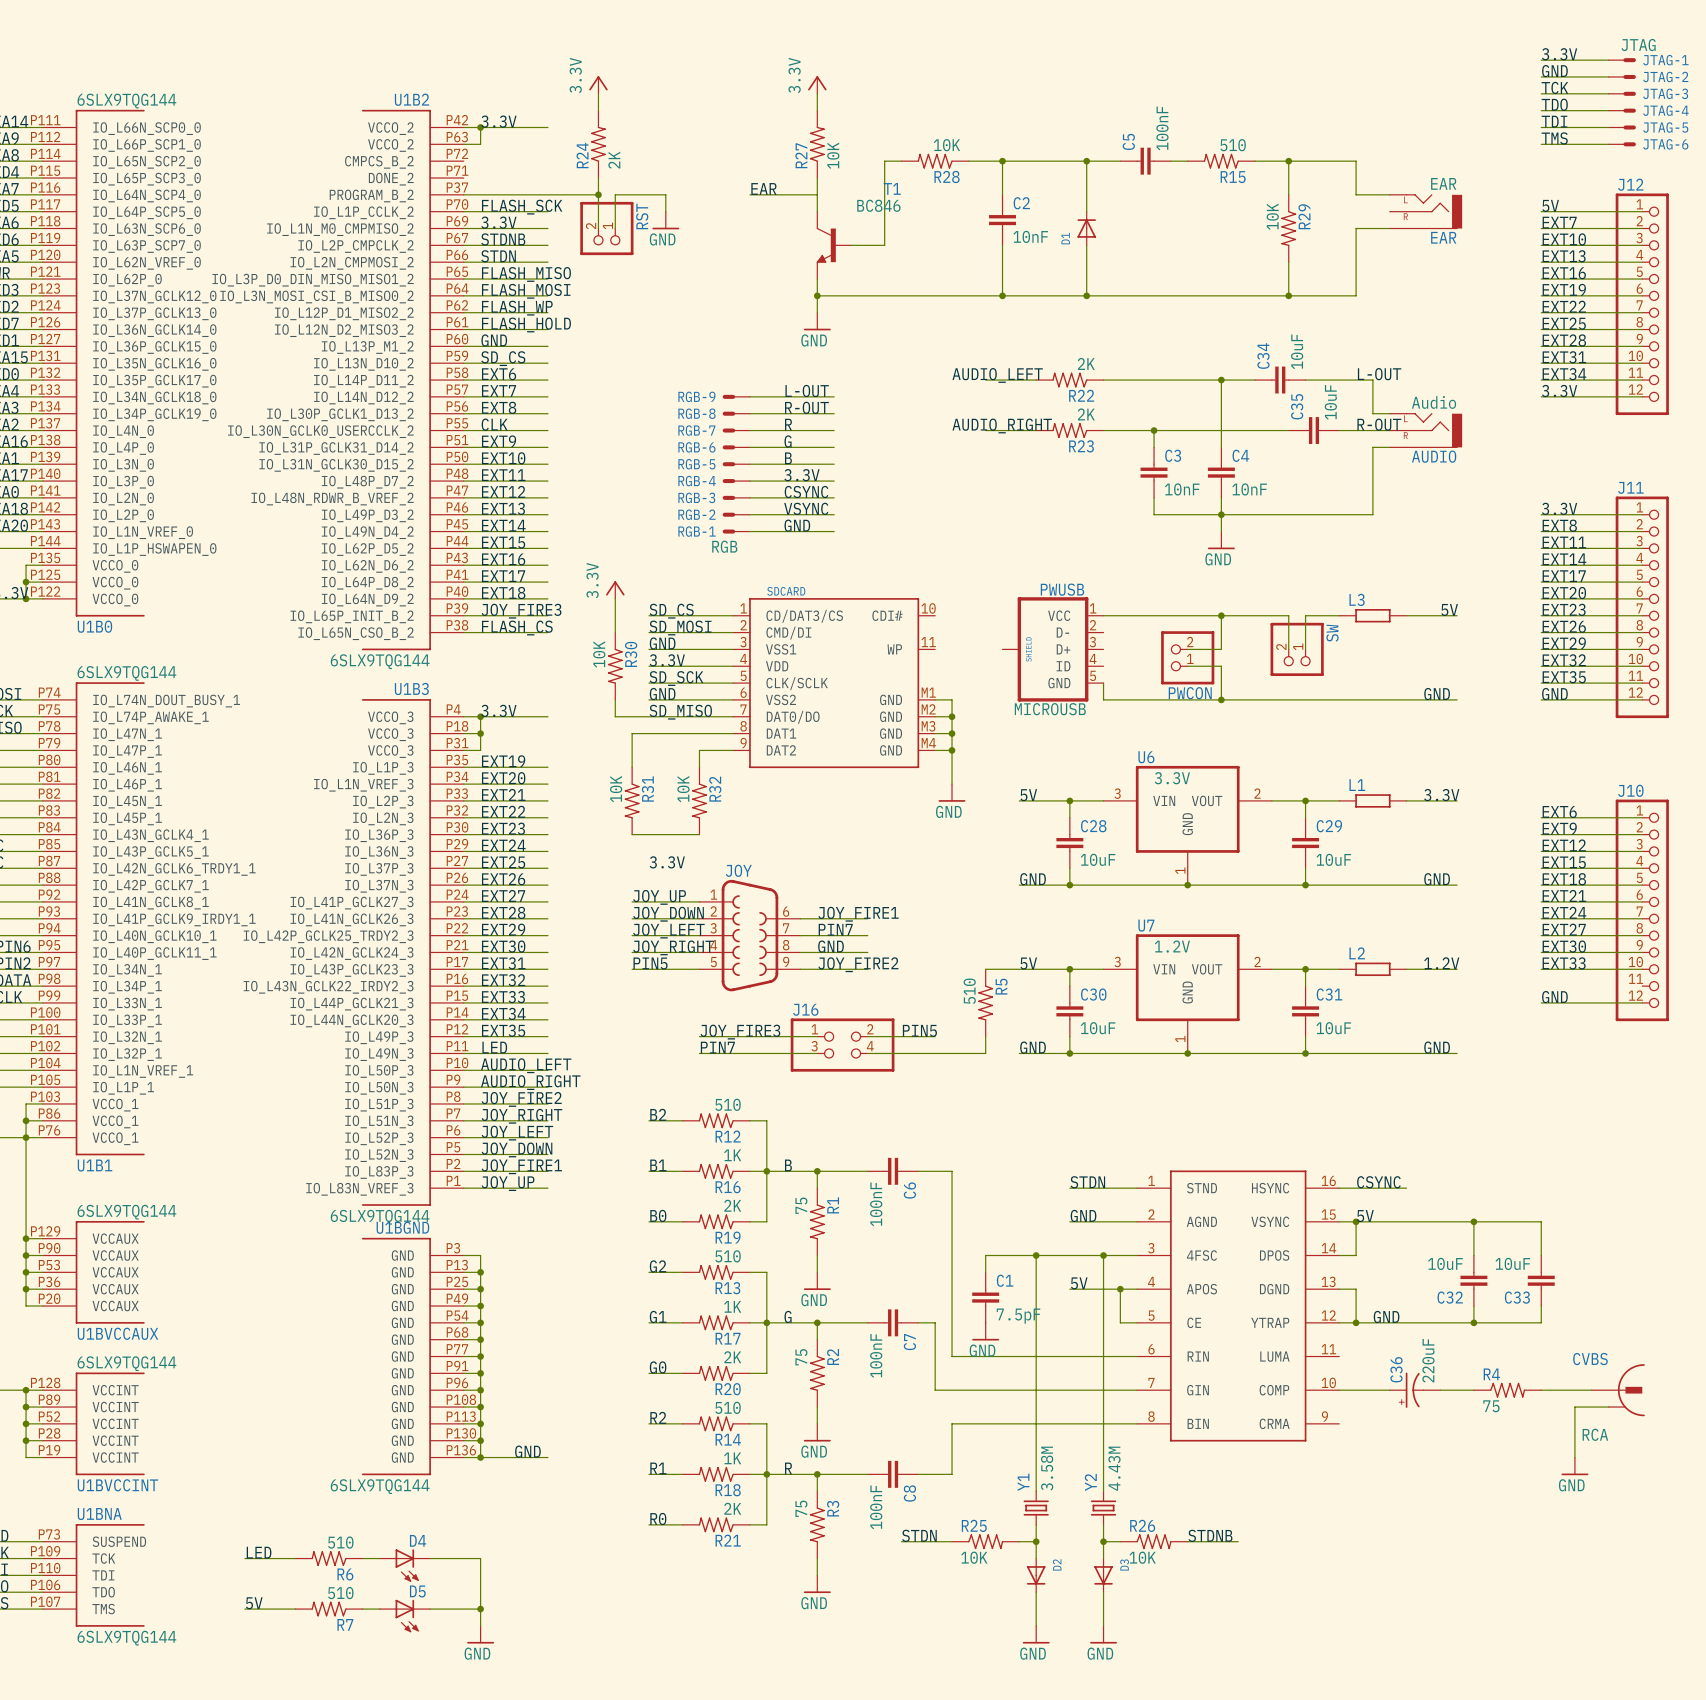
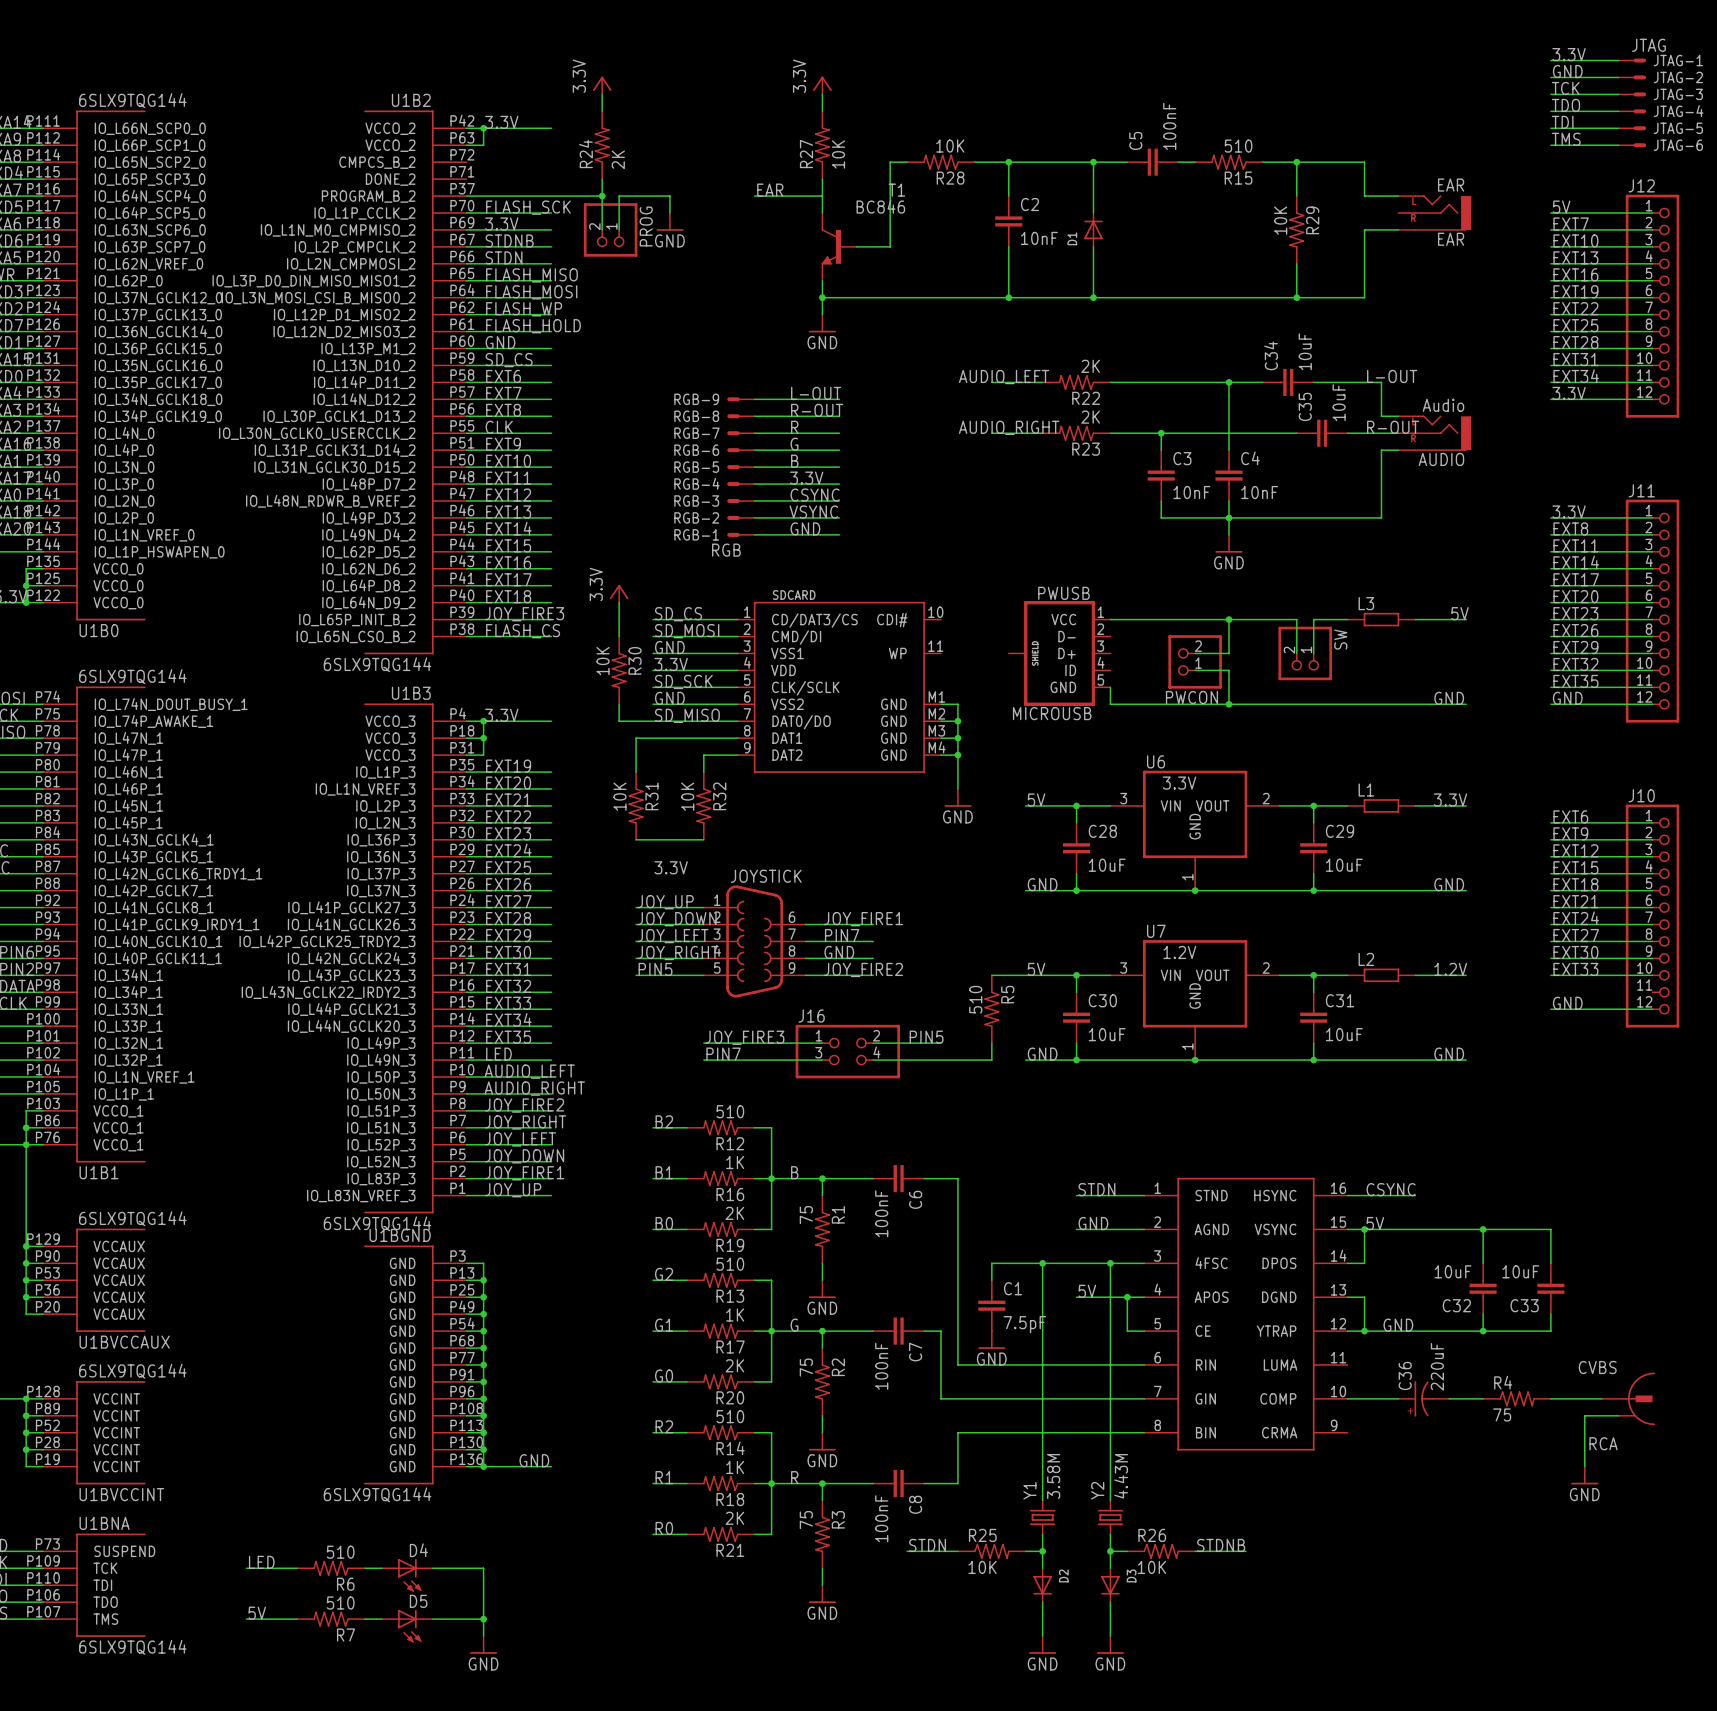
RST name: RST (642, 216) -> PROG (646, 226)
JOY name: JOY (738, 870) -> JOYSTICK (766, 876)

